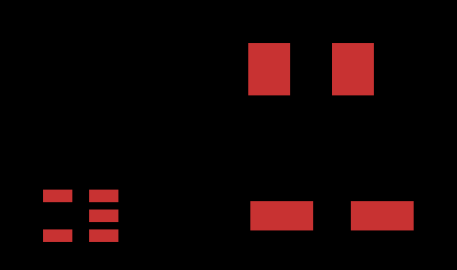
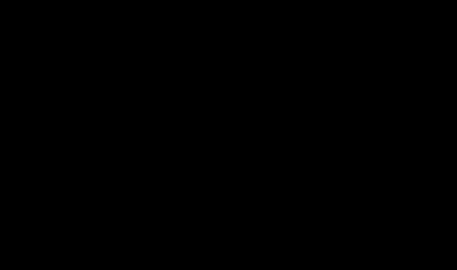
part: (311, 69) -> none
part: (80, 215) -> none
part: (332, 215) -> none

